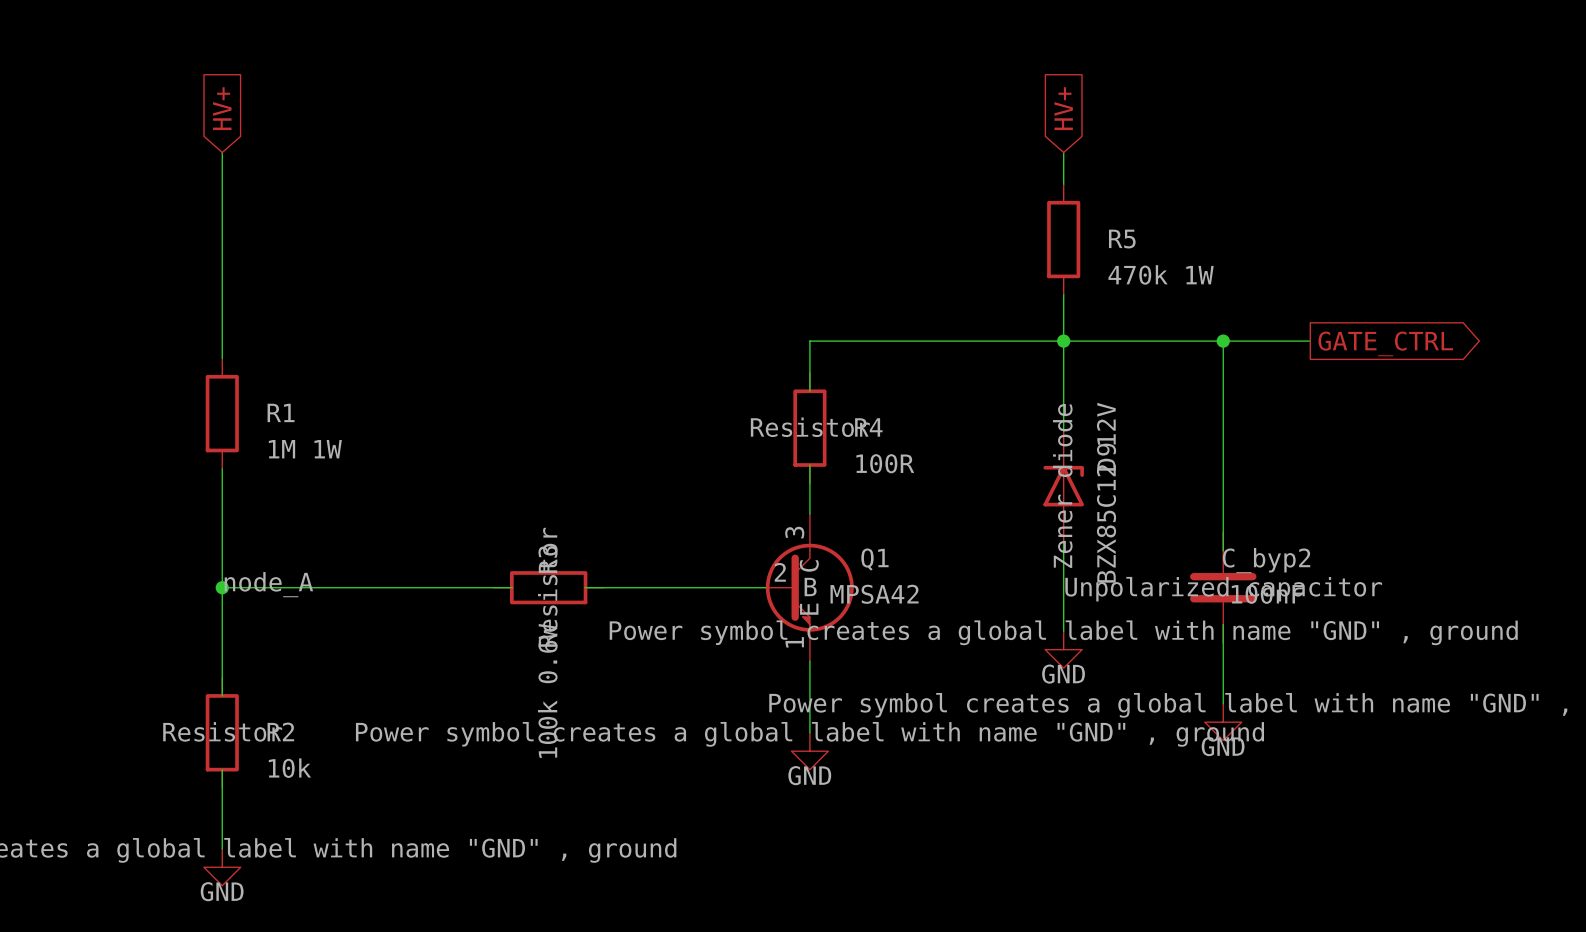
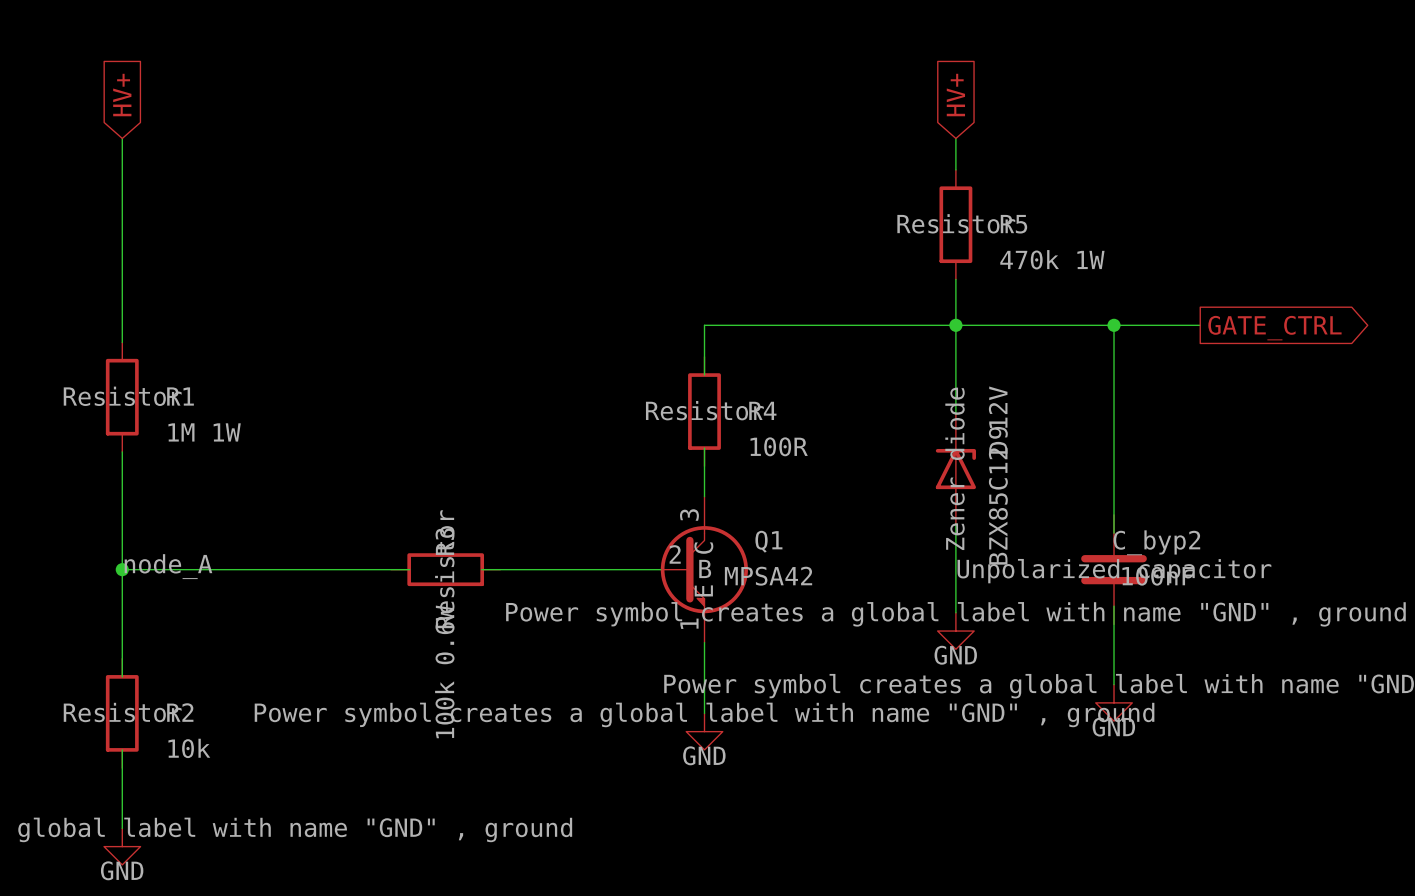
R5 text: none -> Resistor (956, 223)
R1 text: none -> Resistor (122, 396)

